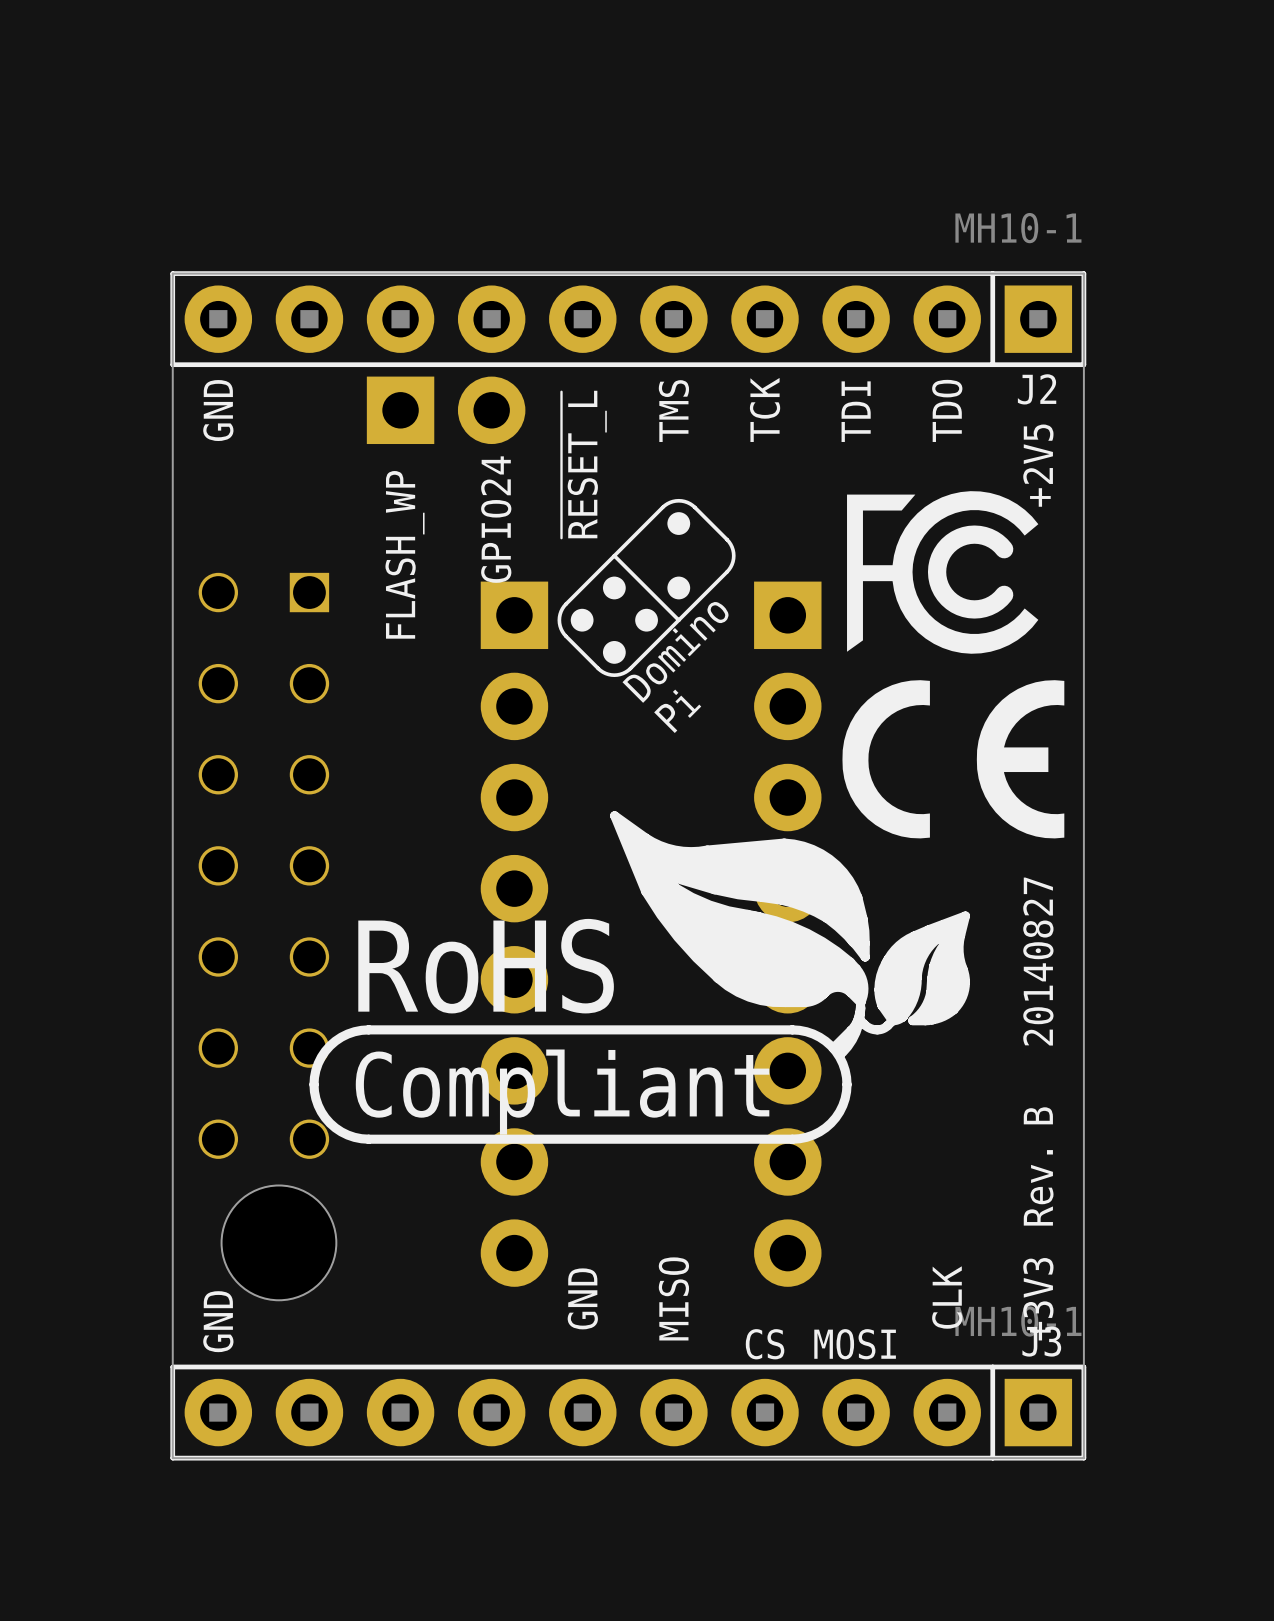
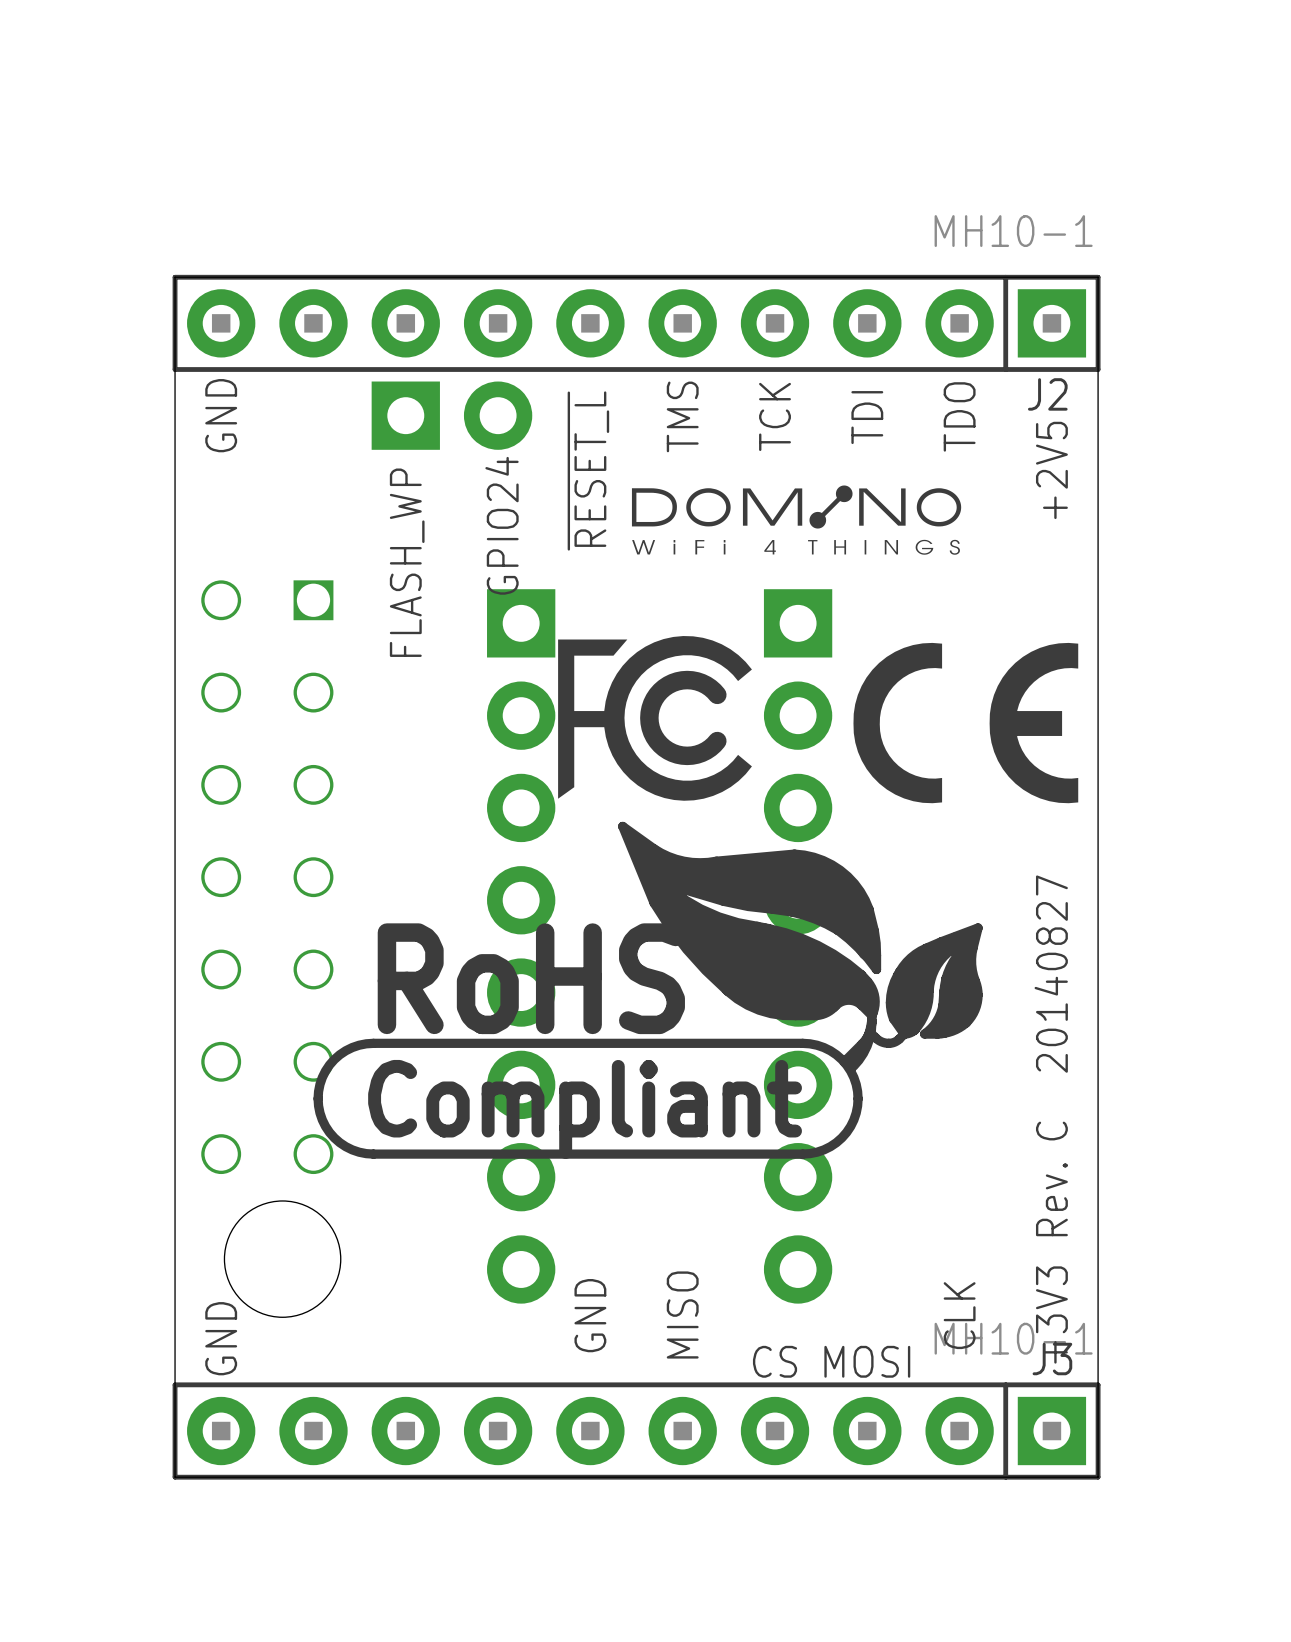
drawing: none -> [631, 485, 962, 555]
drawing: [557, 498, 736, 678] -> none
drawing position: (942, 572) -> (655, 718)
drawing position: (953, 759) -> (965, 723)
text: B (1038, 1115) -> C (1051, 1131)

